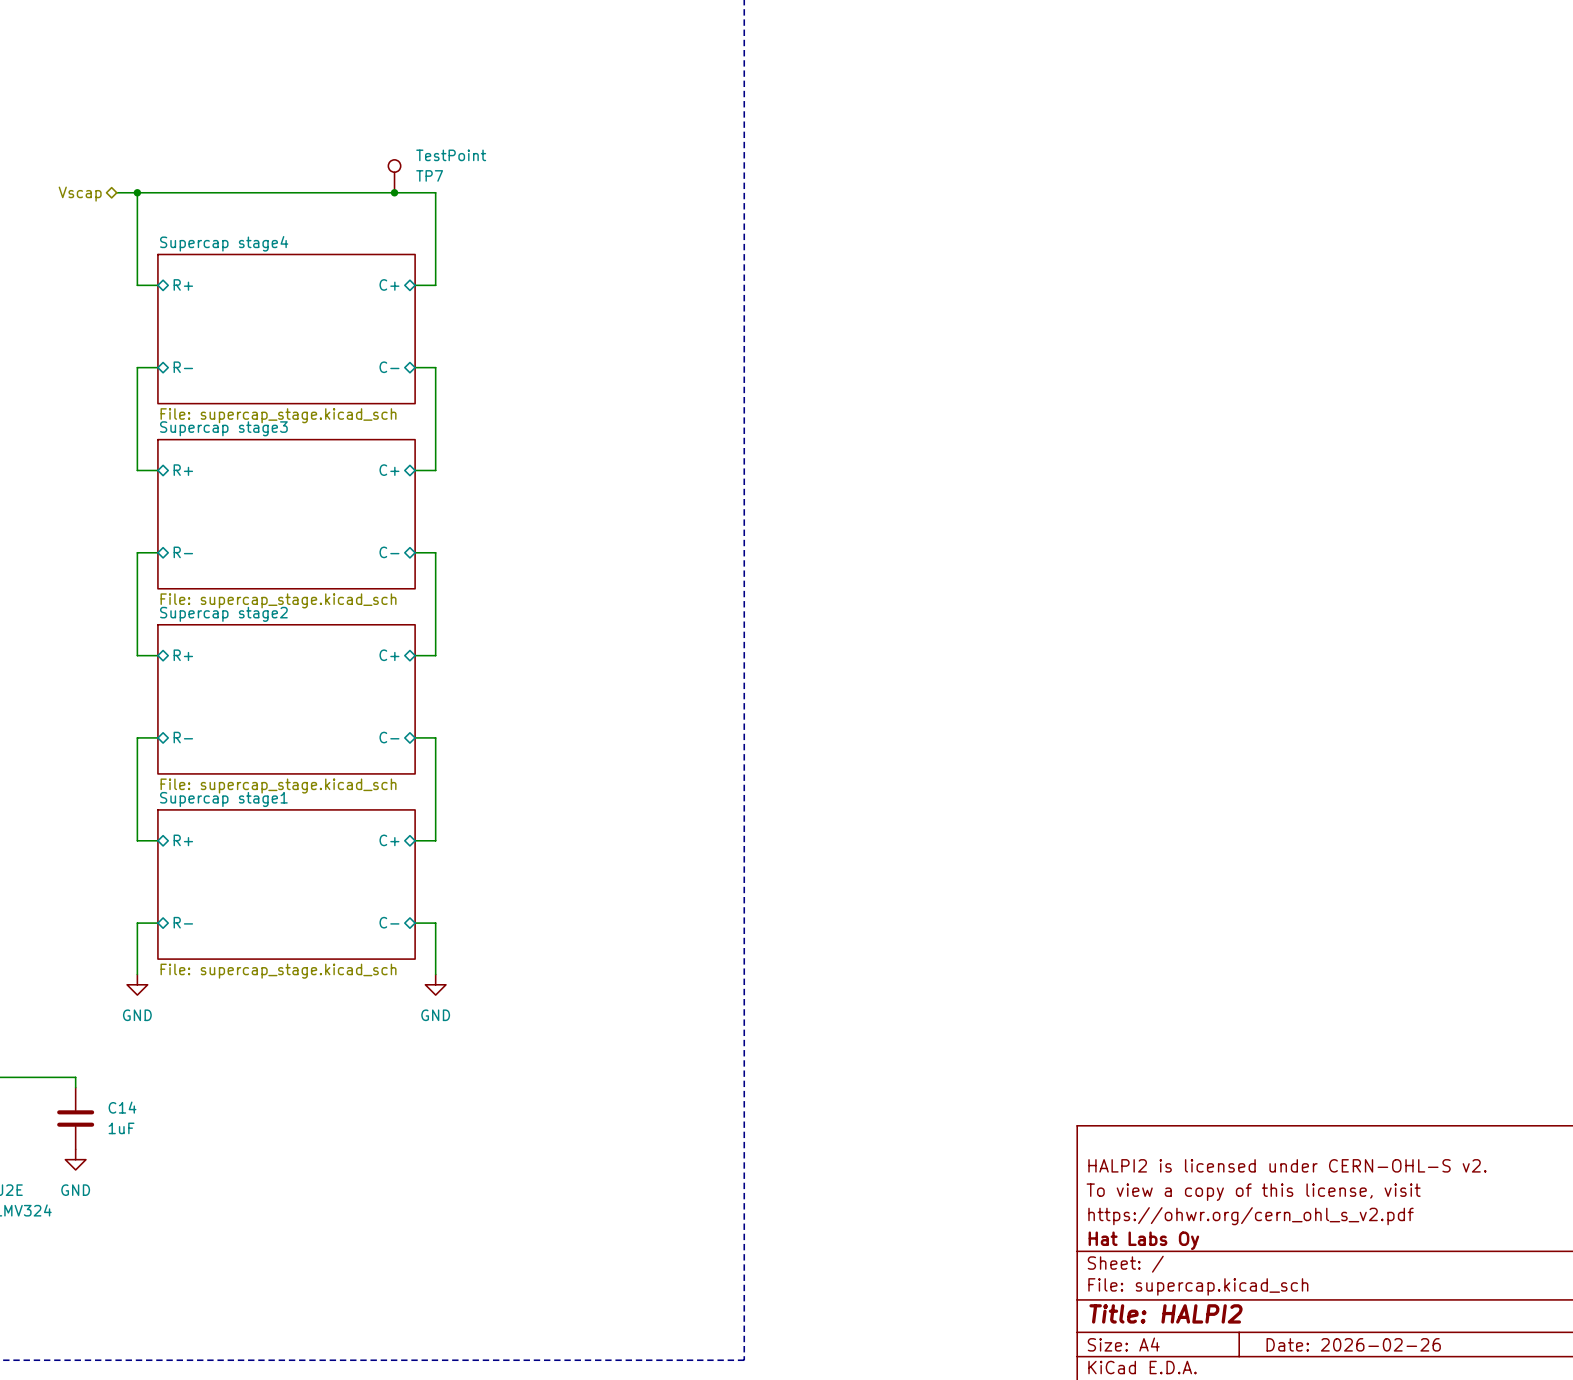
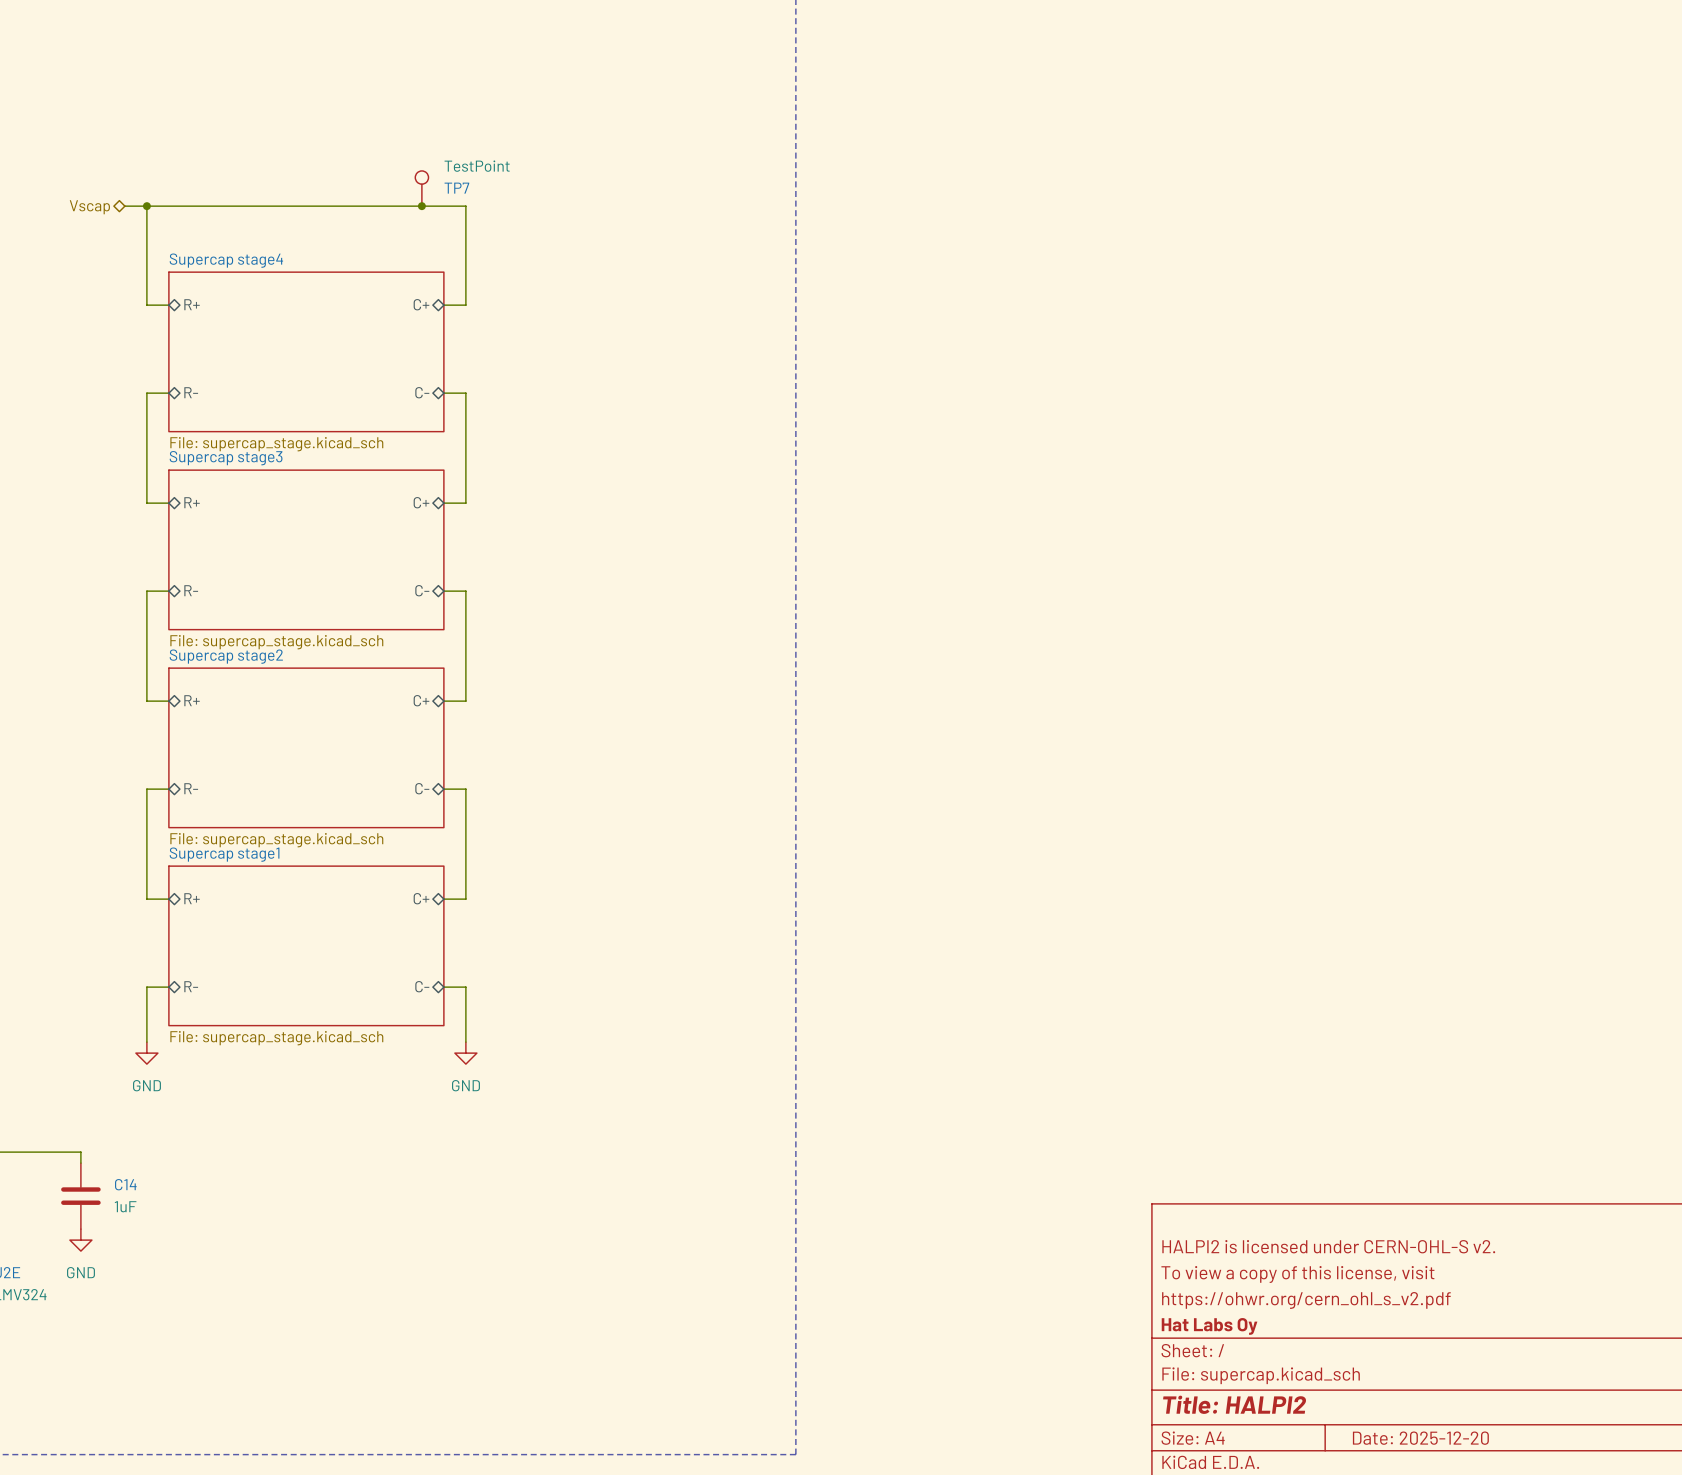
title block: Date: 2026-02-26 (1353, 1344) -> Date: 2025-12-20 (1420, 1438)

